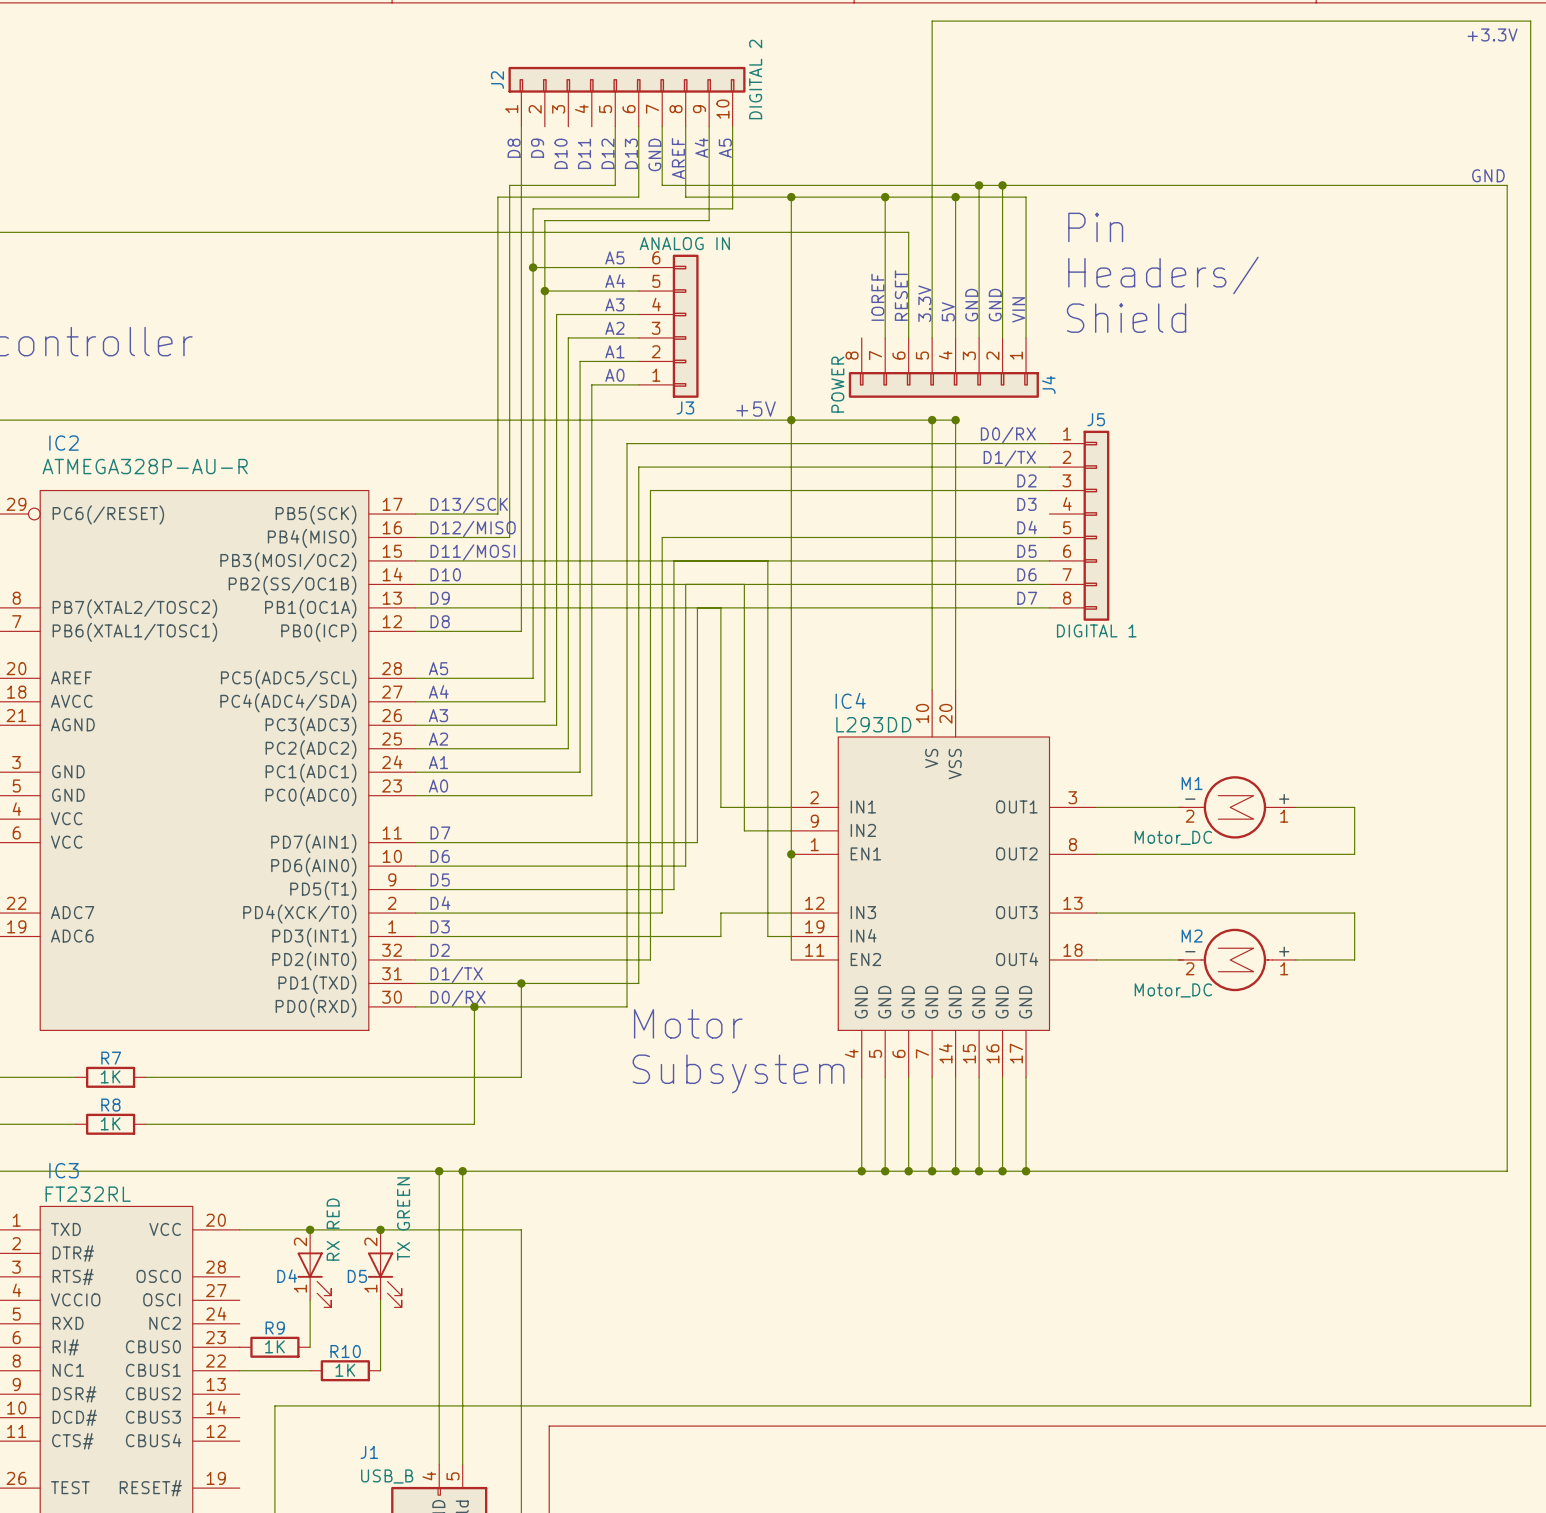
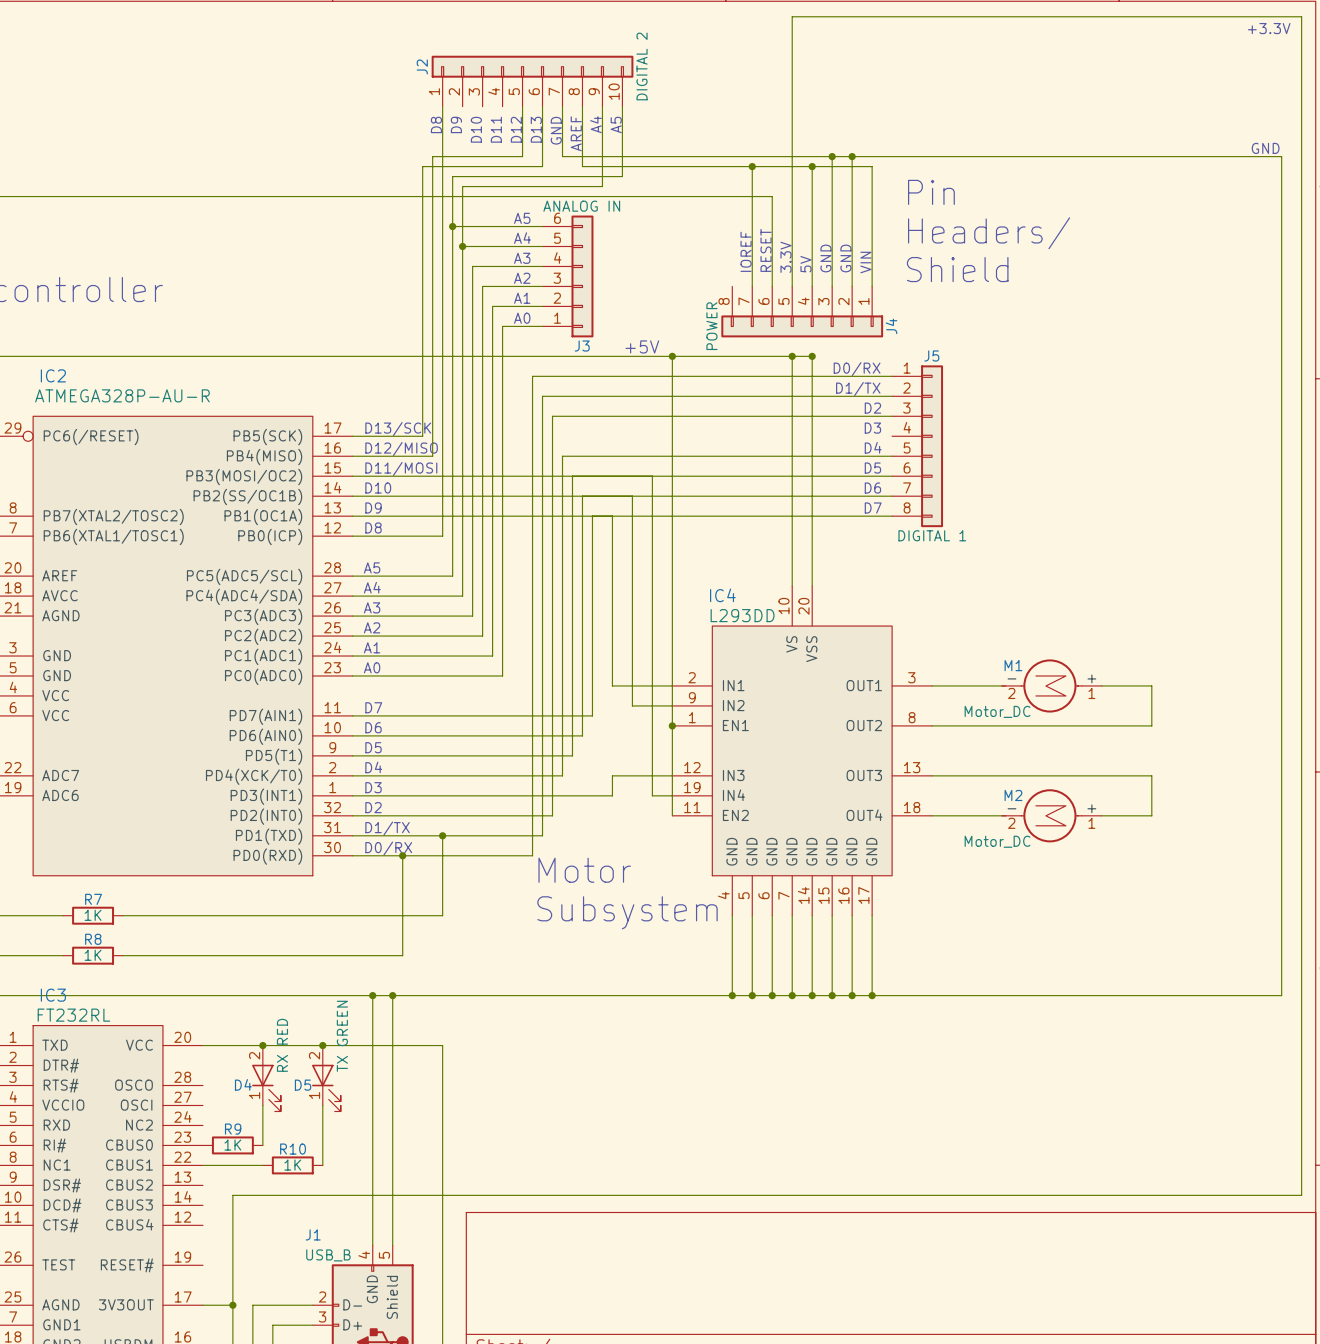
wire: (791, 197) (791, 420) -> none
junction: (791, 197) -> none

